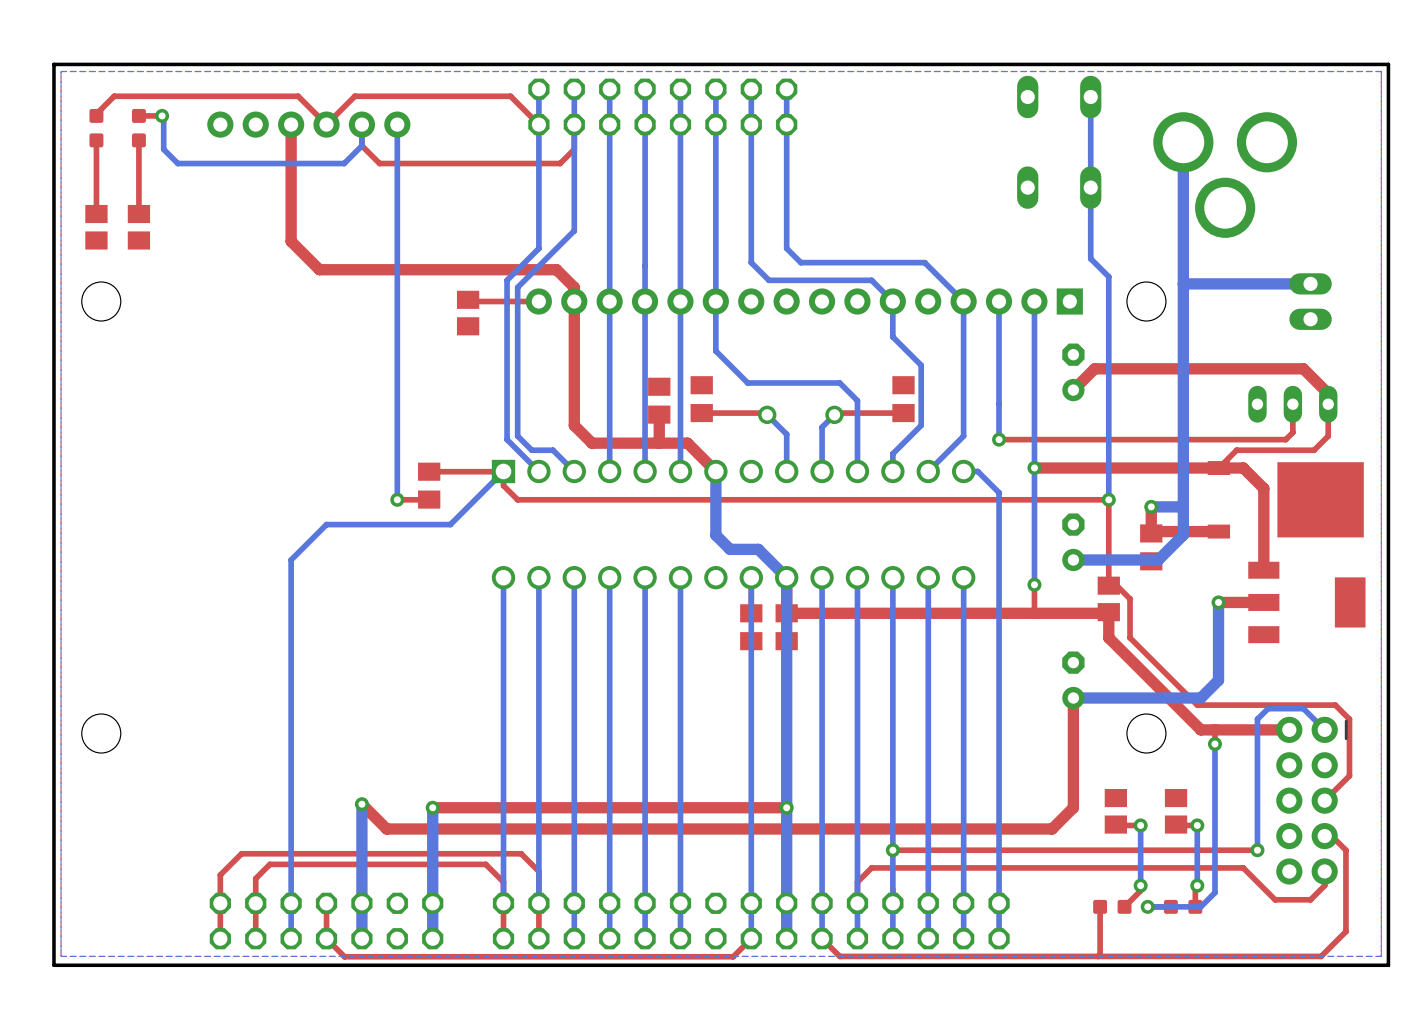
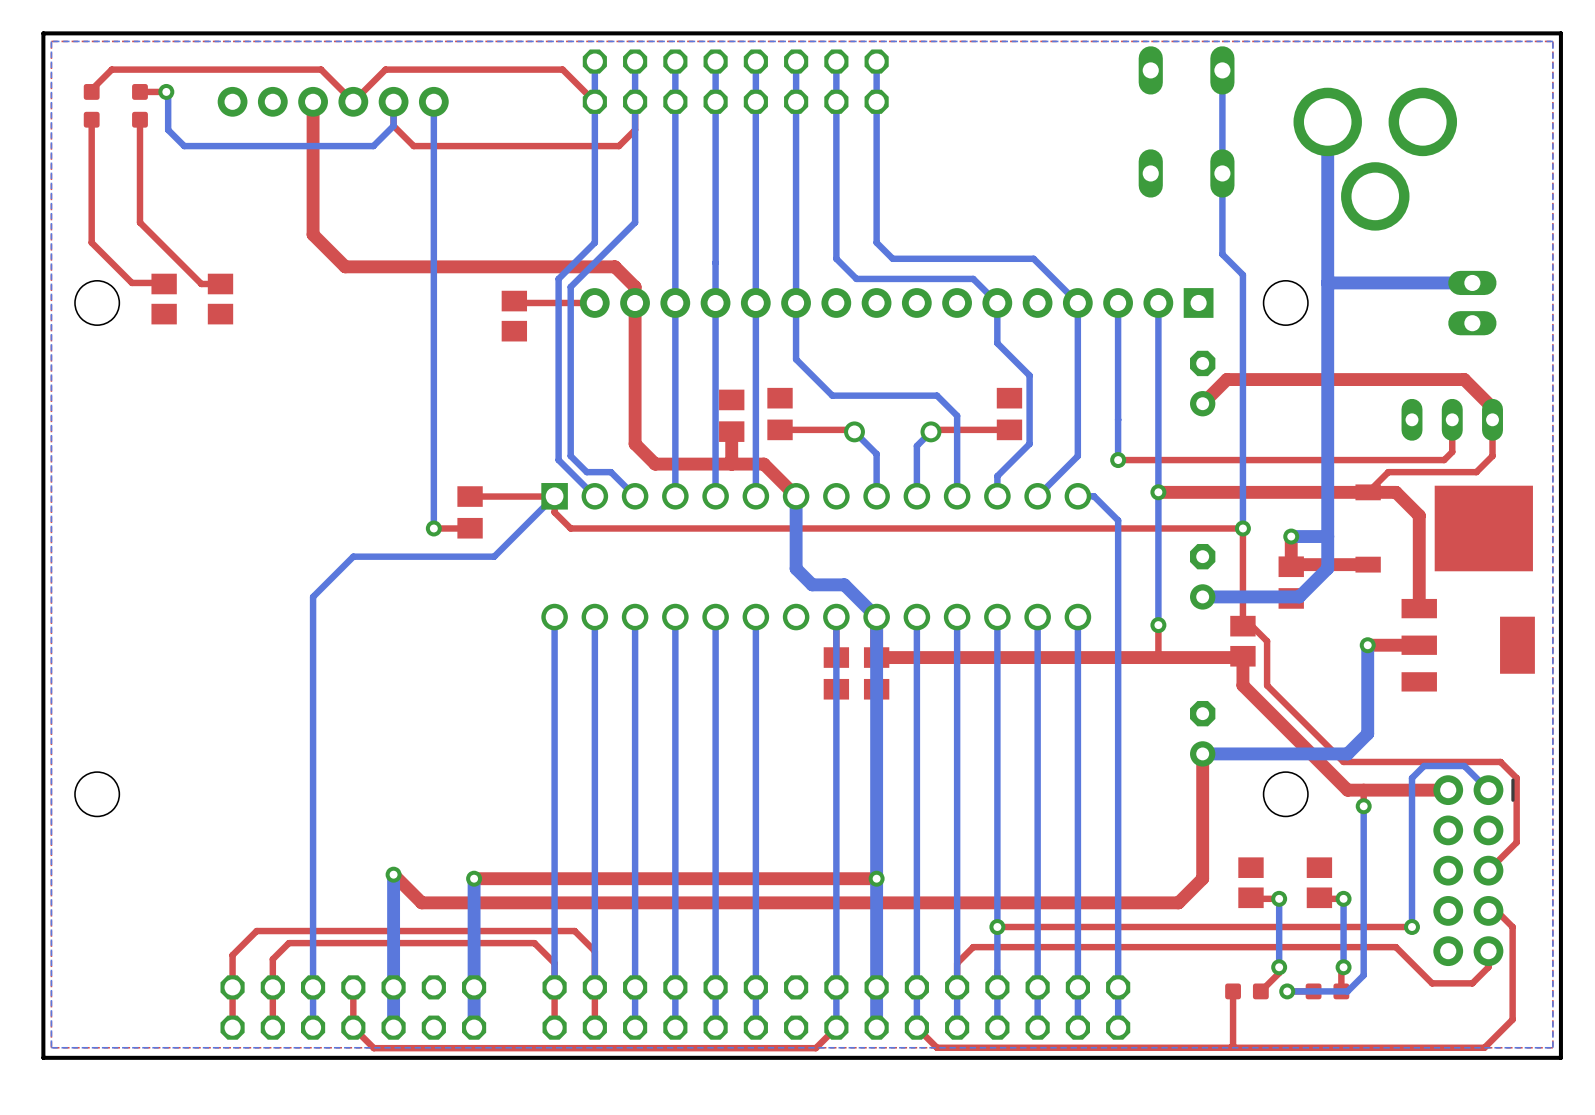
top track: none -> (91, 203) (91, 242) (131, 282) (164, 283)
top track: none -> (139, 203) (139, 222) (201, 283) (220, 283)
part: (96, 227) -> none
part: (138, 227) -> none
part: none -> (164, 299)
part: none -> (220, 299)

